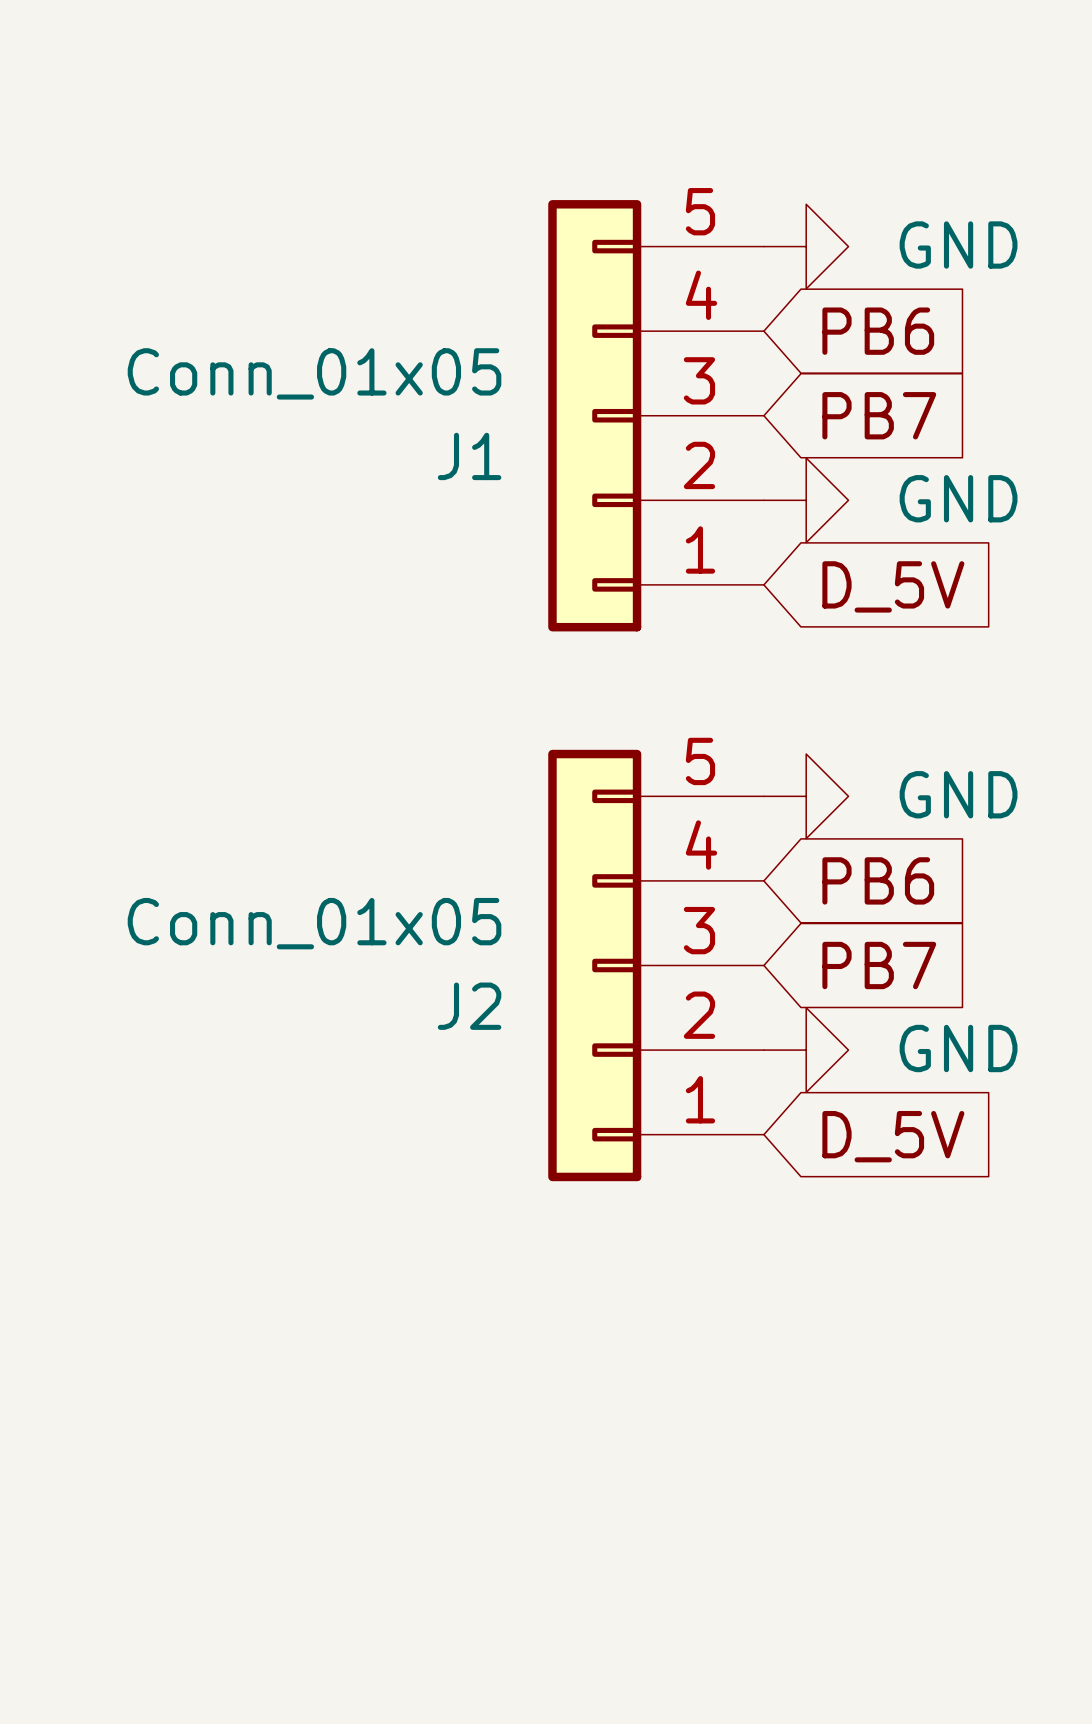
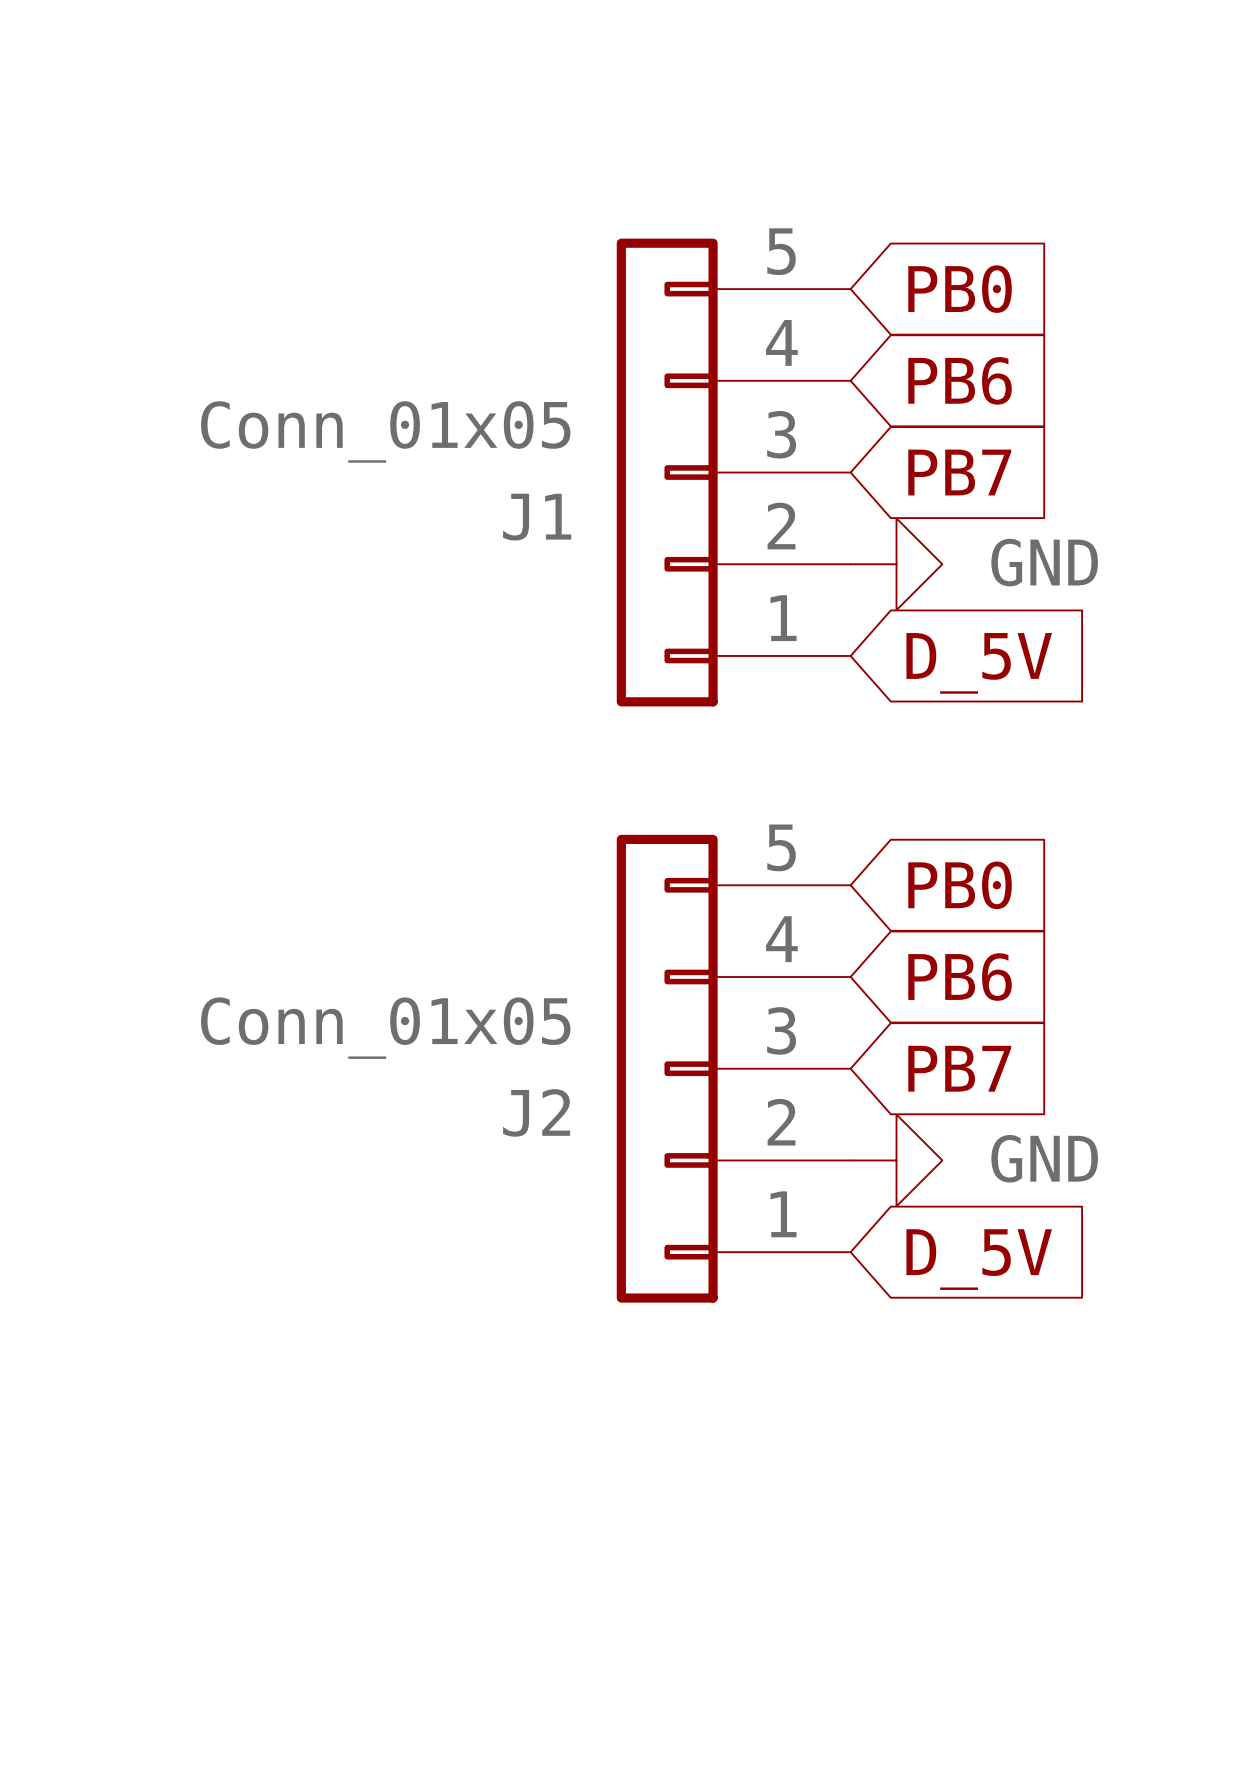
power symbol: GND (806, 246) -> none
global label: none -> PB0 (960, 289)
power symbol: GND (806, 796) -> none
global label: none -> PB0 (960, 885)

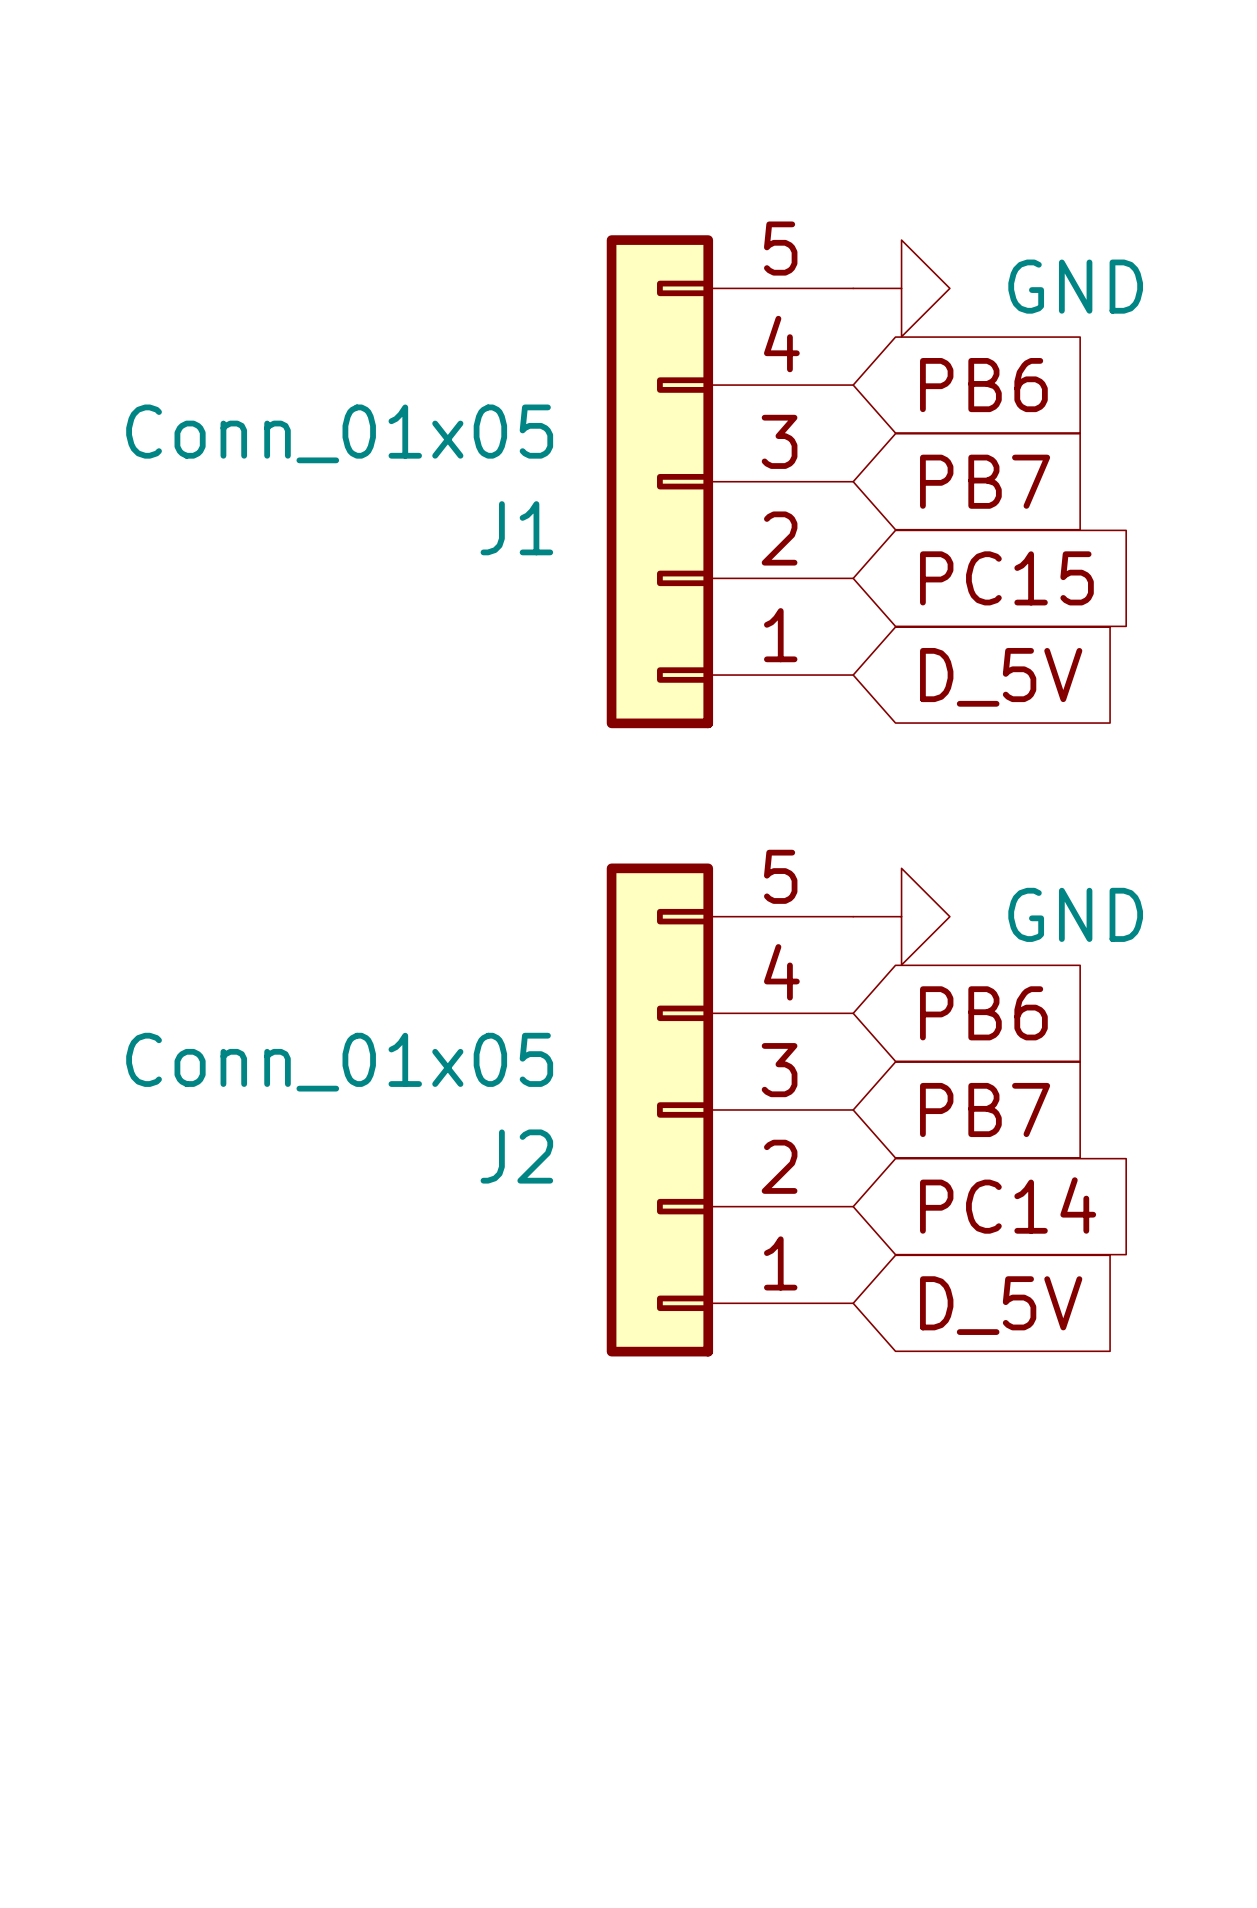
power symbol: none -> GND (901, 288)
global label: PB0 (960, 289) -> none
power symbol: GND (896, 564) -> none
global label: none -> PC15 (1006, 578)
power symbol: none -> GND (901, 916)
global label: PB0 (960, 885) -> none
power symbol: GND (896, 1160) -> none
global label: none -> PC14 (1008, 1205)

